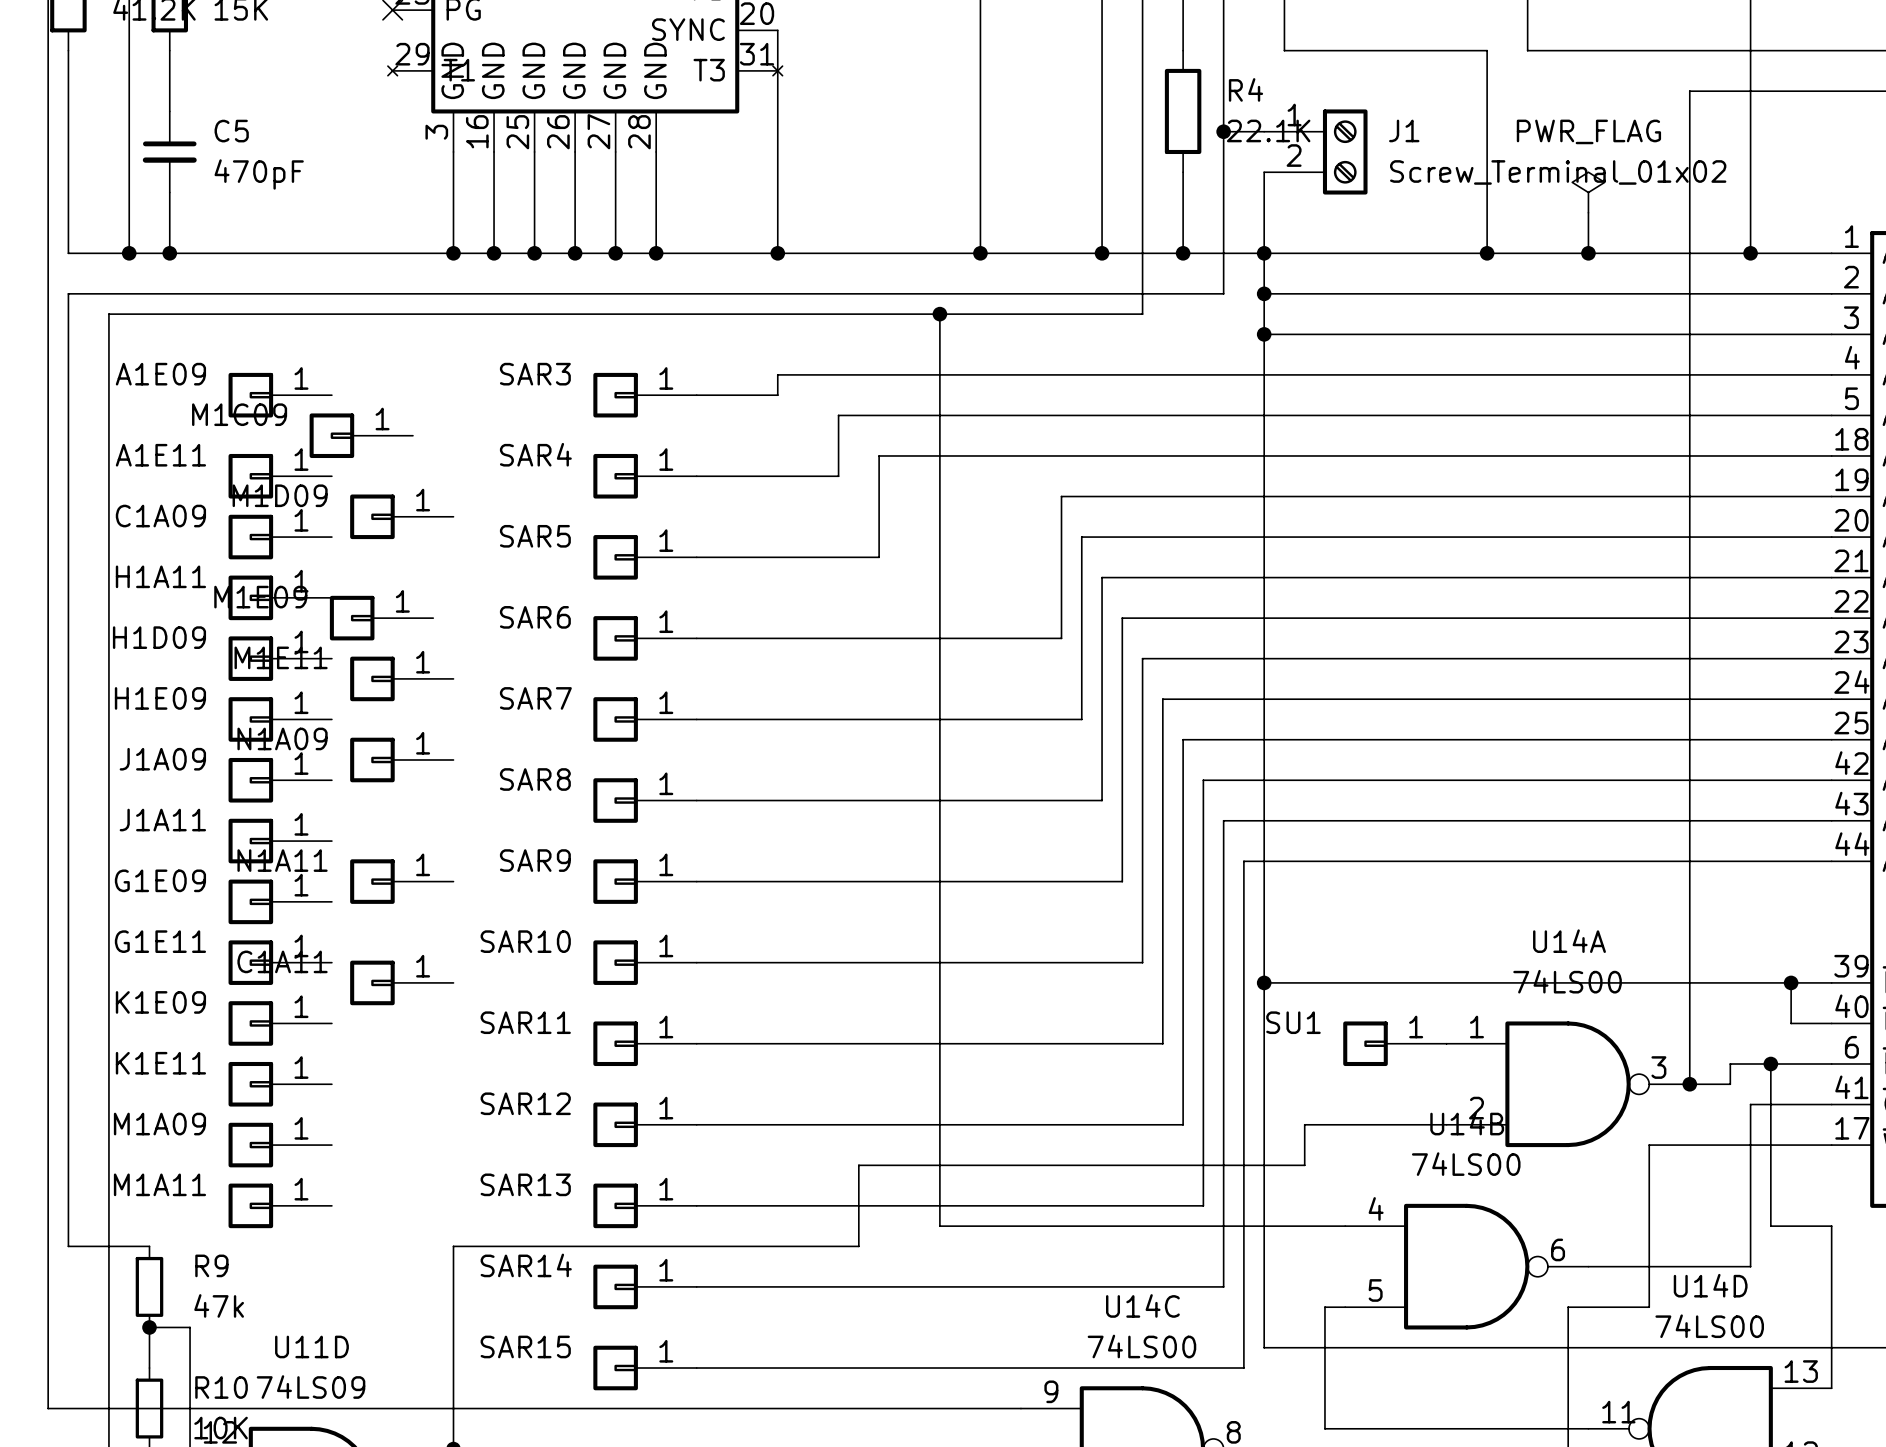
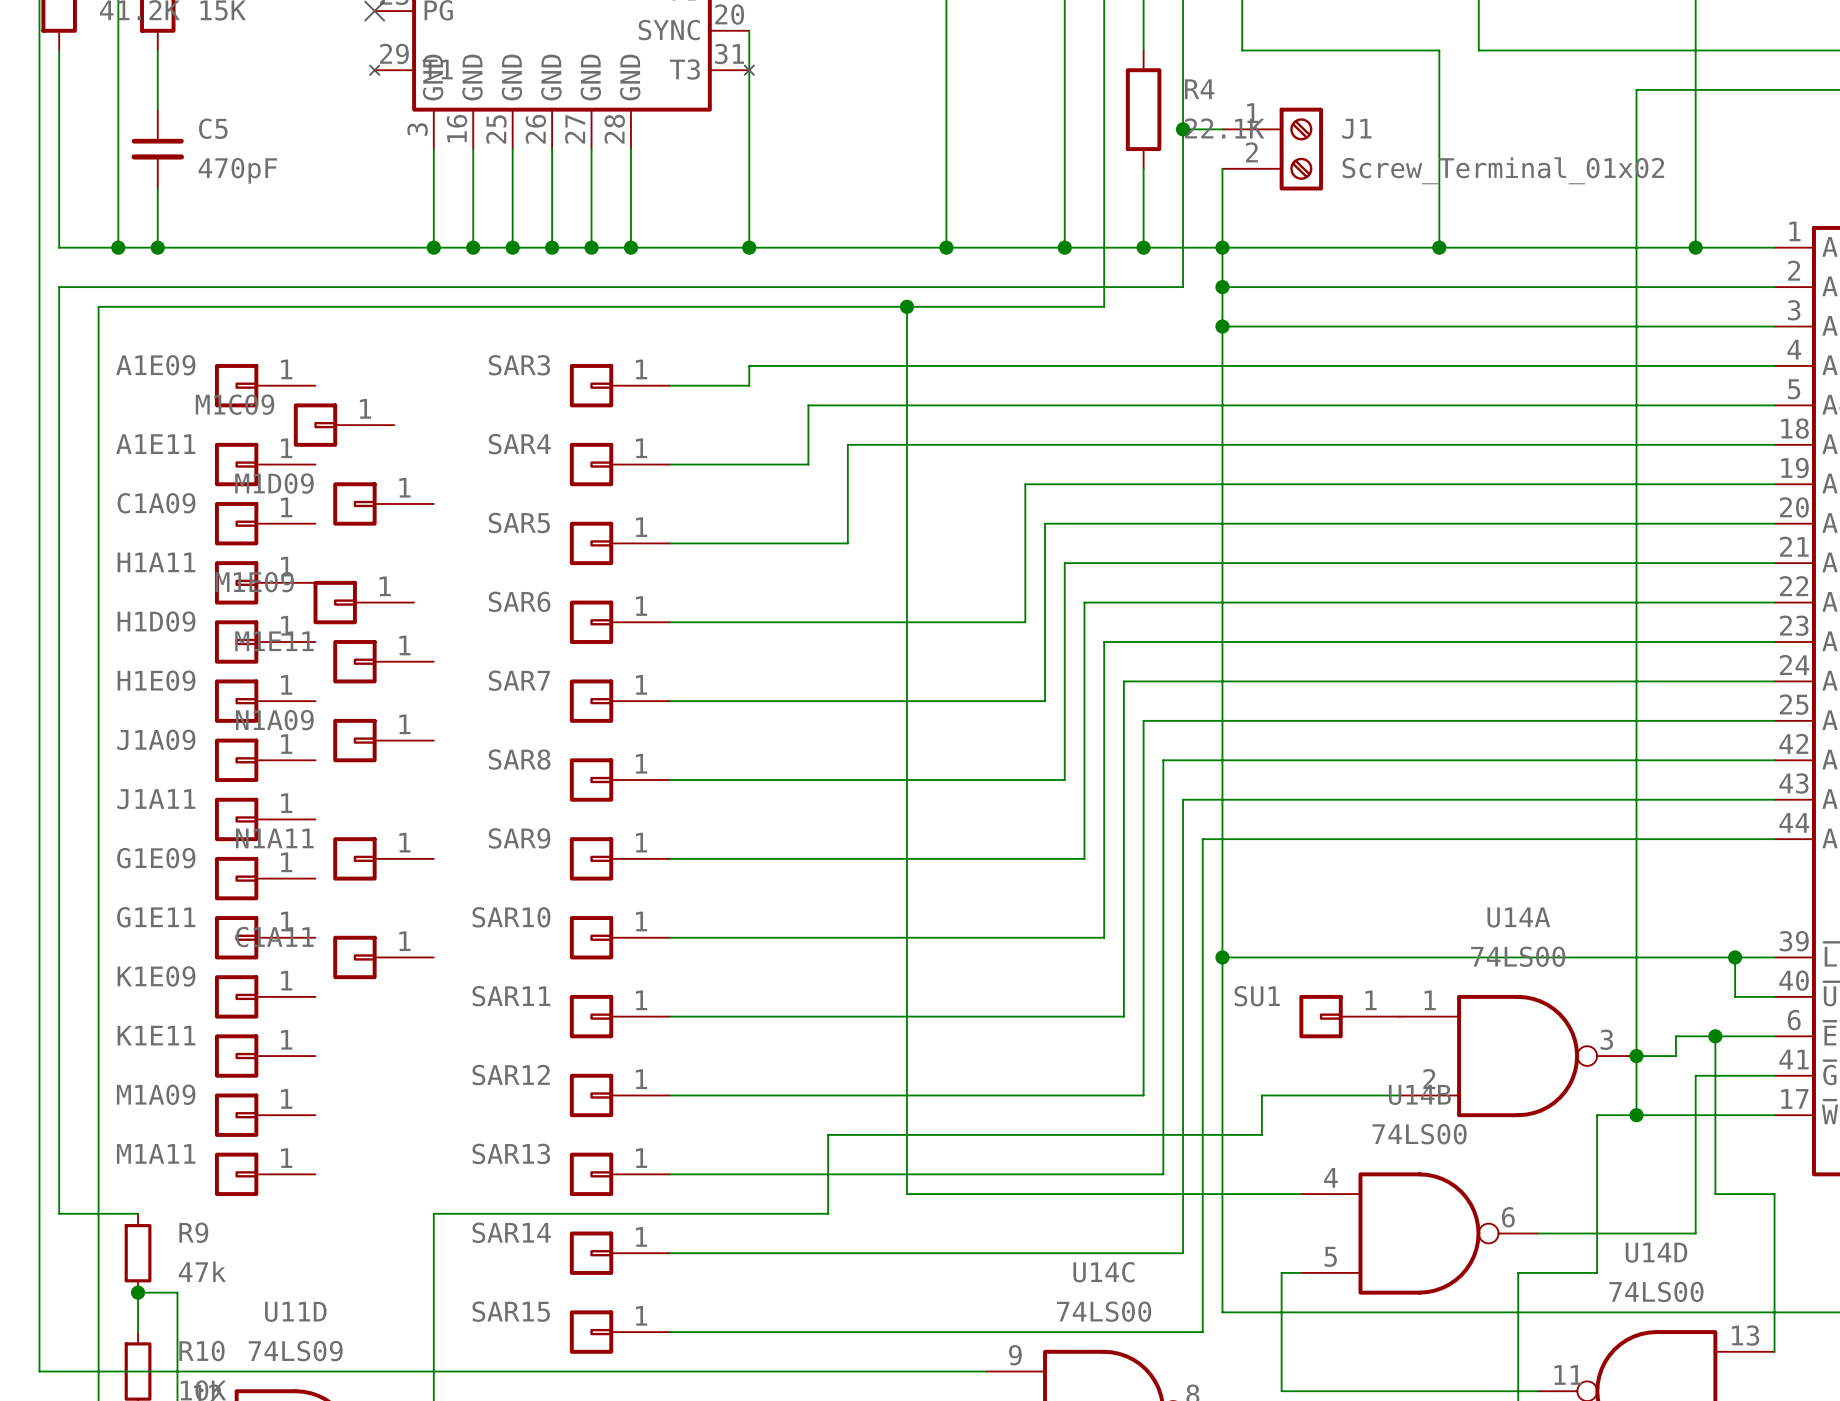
power symbol: PWR_FLAG (1588, 192) -> none
wire: (1588, 212) (1588, 253) -> none
junction: (1588, 253) -> none
wire: none -> (1636, 1056) (1636, 1115)
junction: none -> (1636, 1115)

